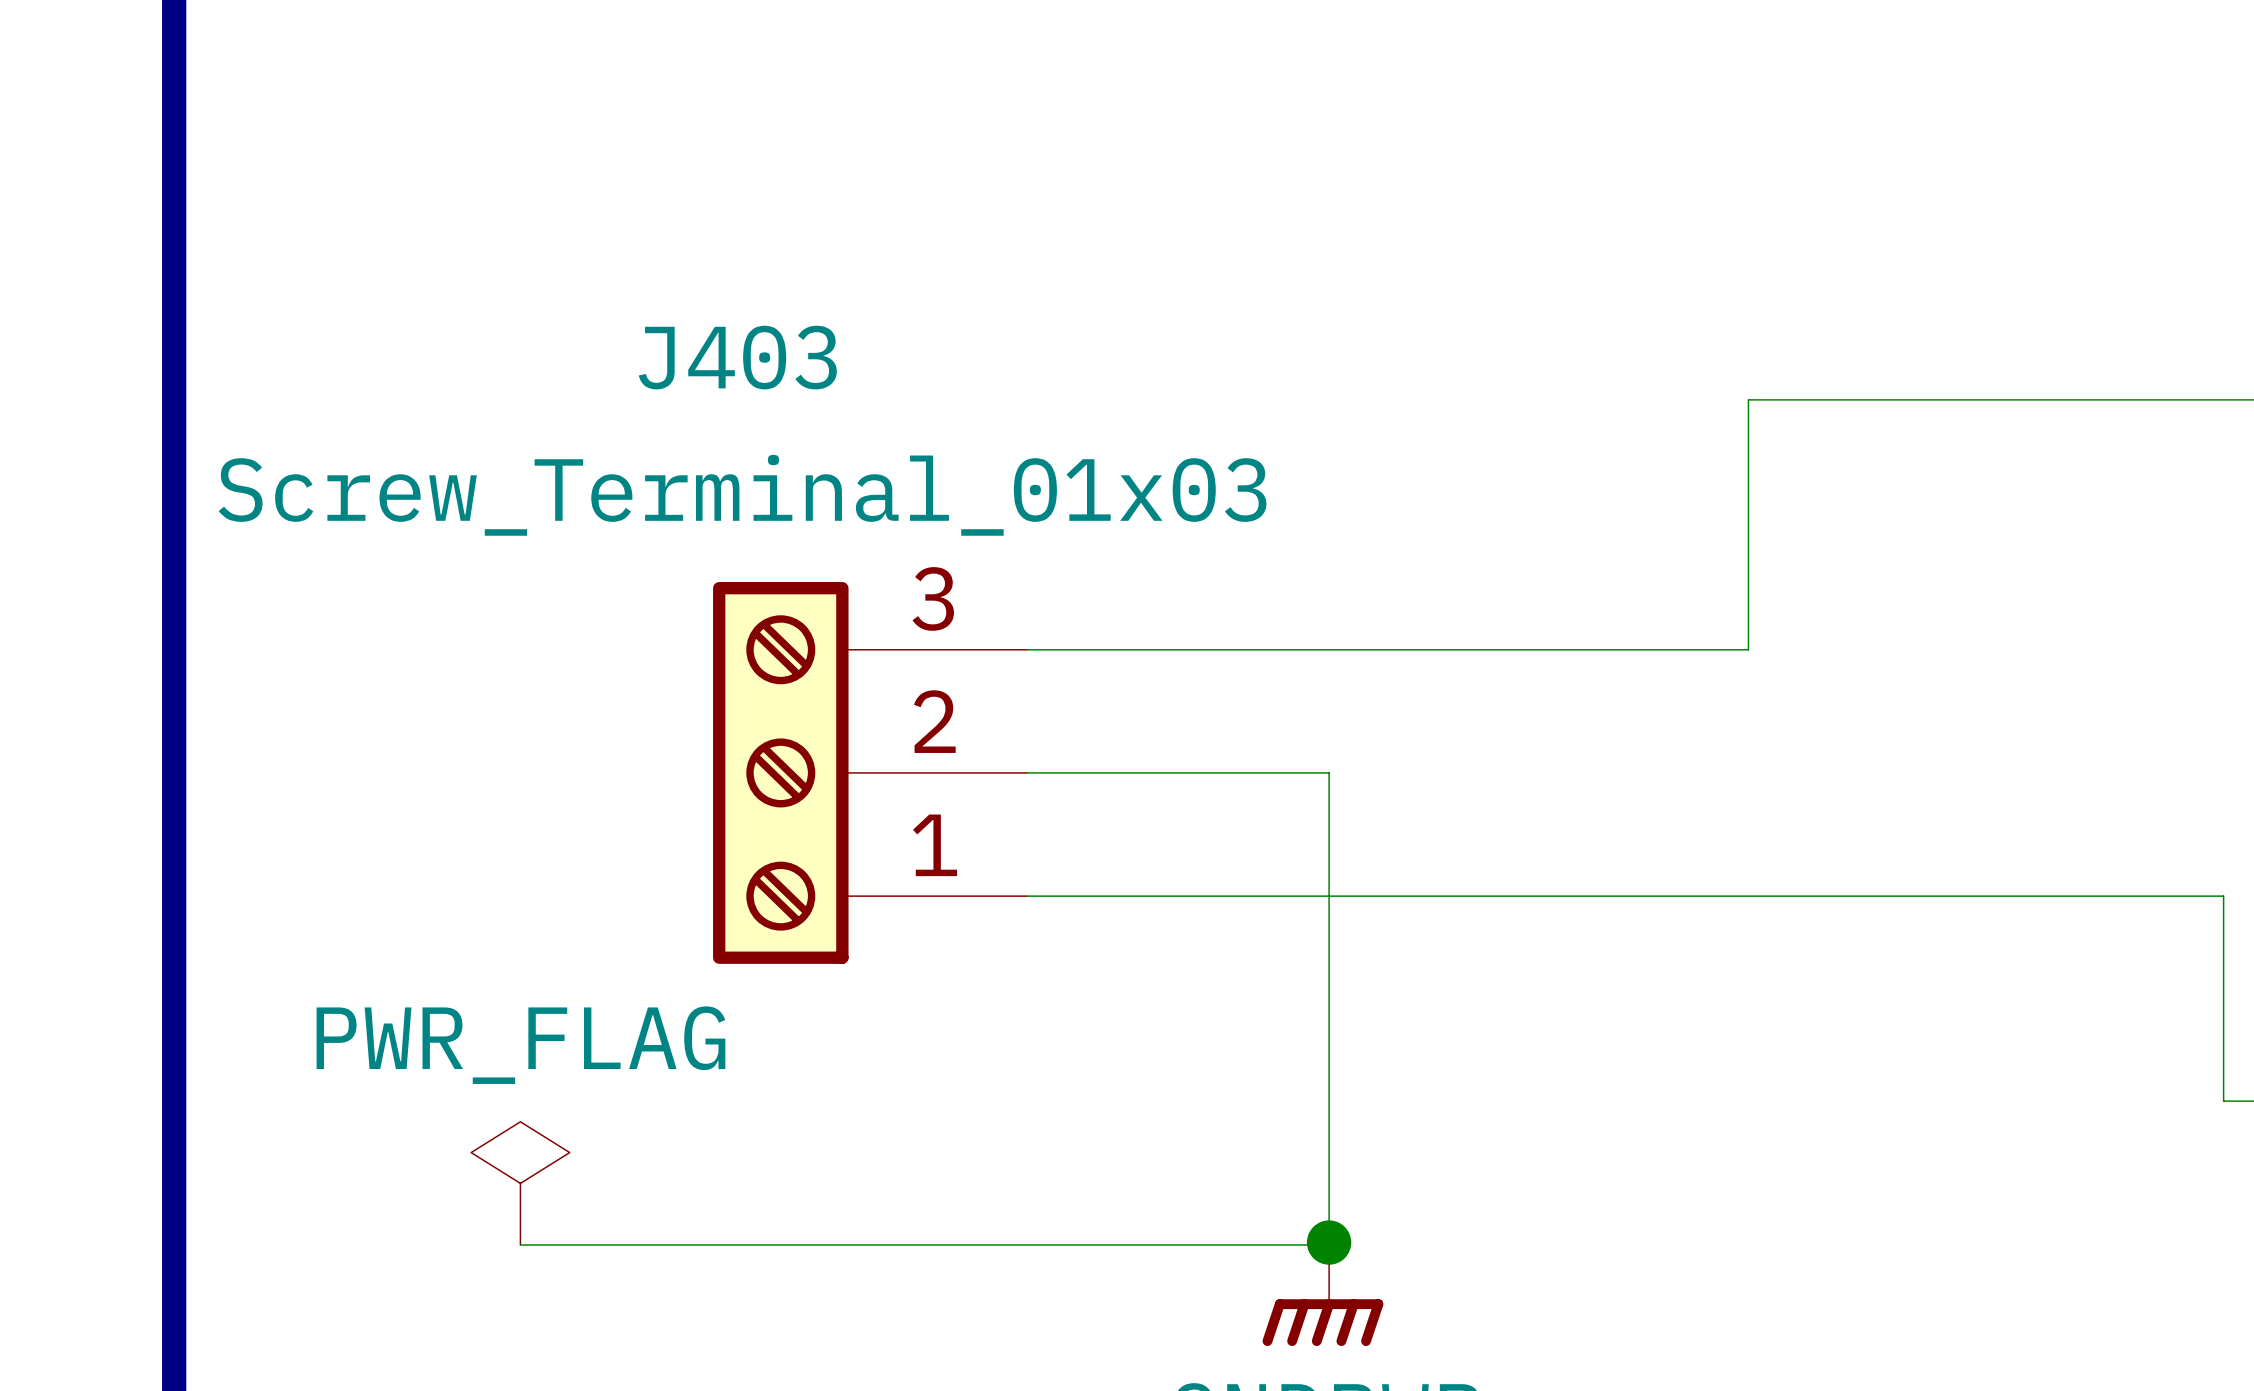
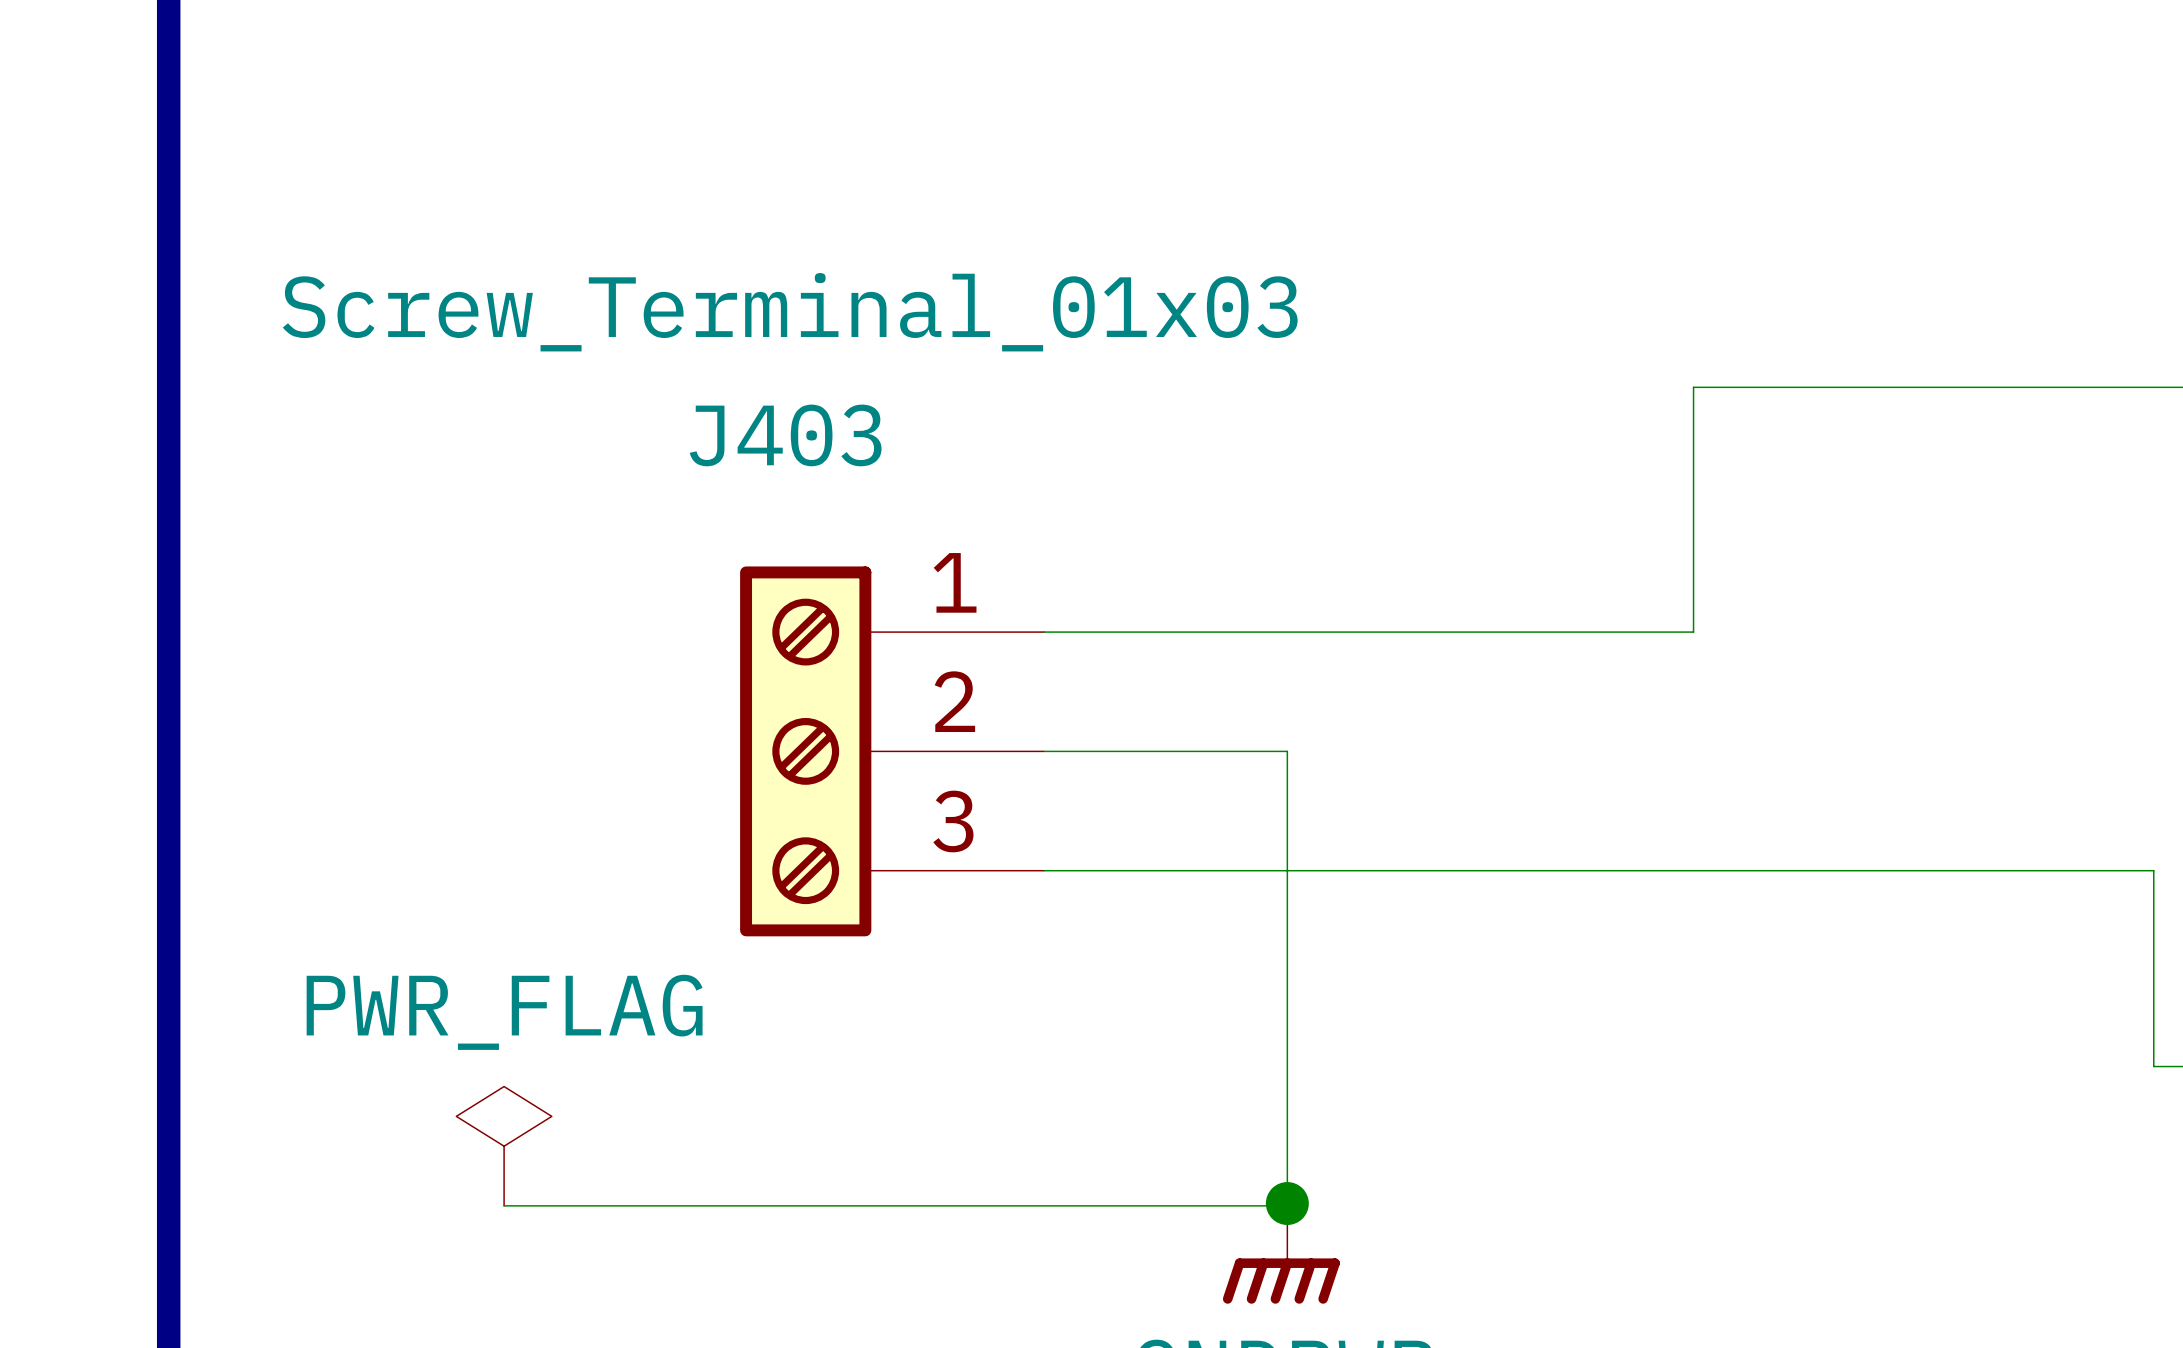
J403 value position: Screw_Terminal_01x03 (742, 495) -> Screw_Terminal_01x03 (790, 312)
wire: (1027, 649) (1748, 649) -> (1044, 632) (1693, 632) (1693, 629)
J403 flip: as is (780, 772) -> up-down (805, 751)
wire: (1027, 772) (1329, 772) (1329, 775) -> (1044, 751) (1287, 751)
wire: (1027, 896) (2223, 896) (2223, 898) -> (1044, 870) (2153, 870)

